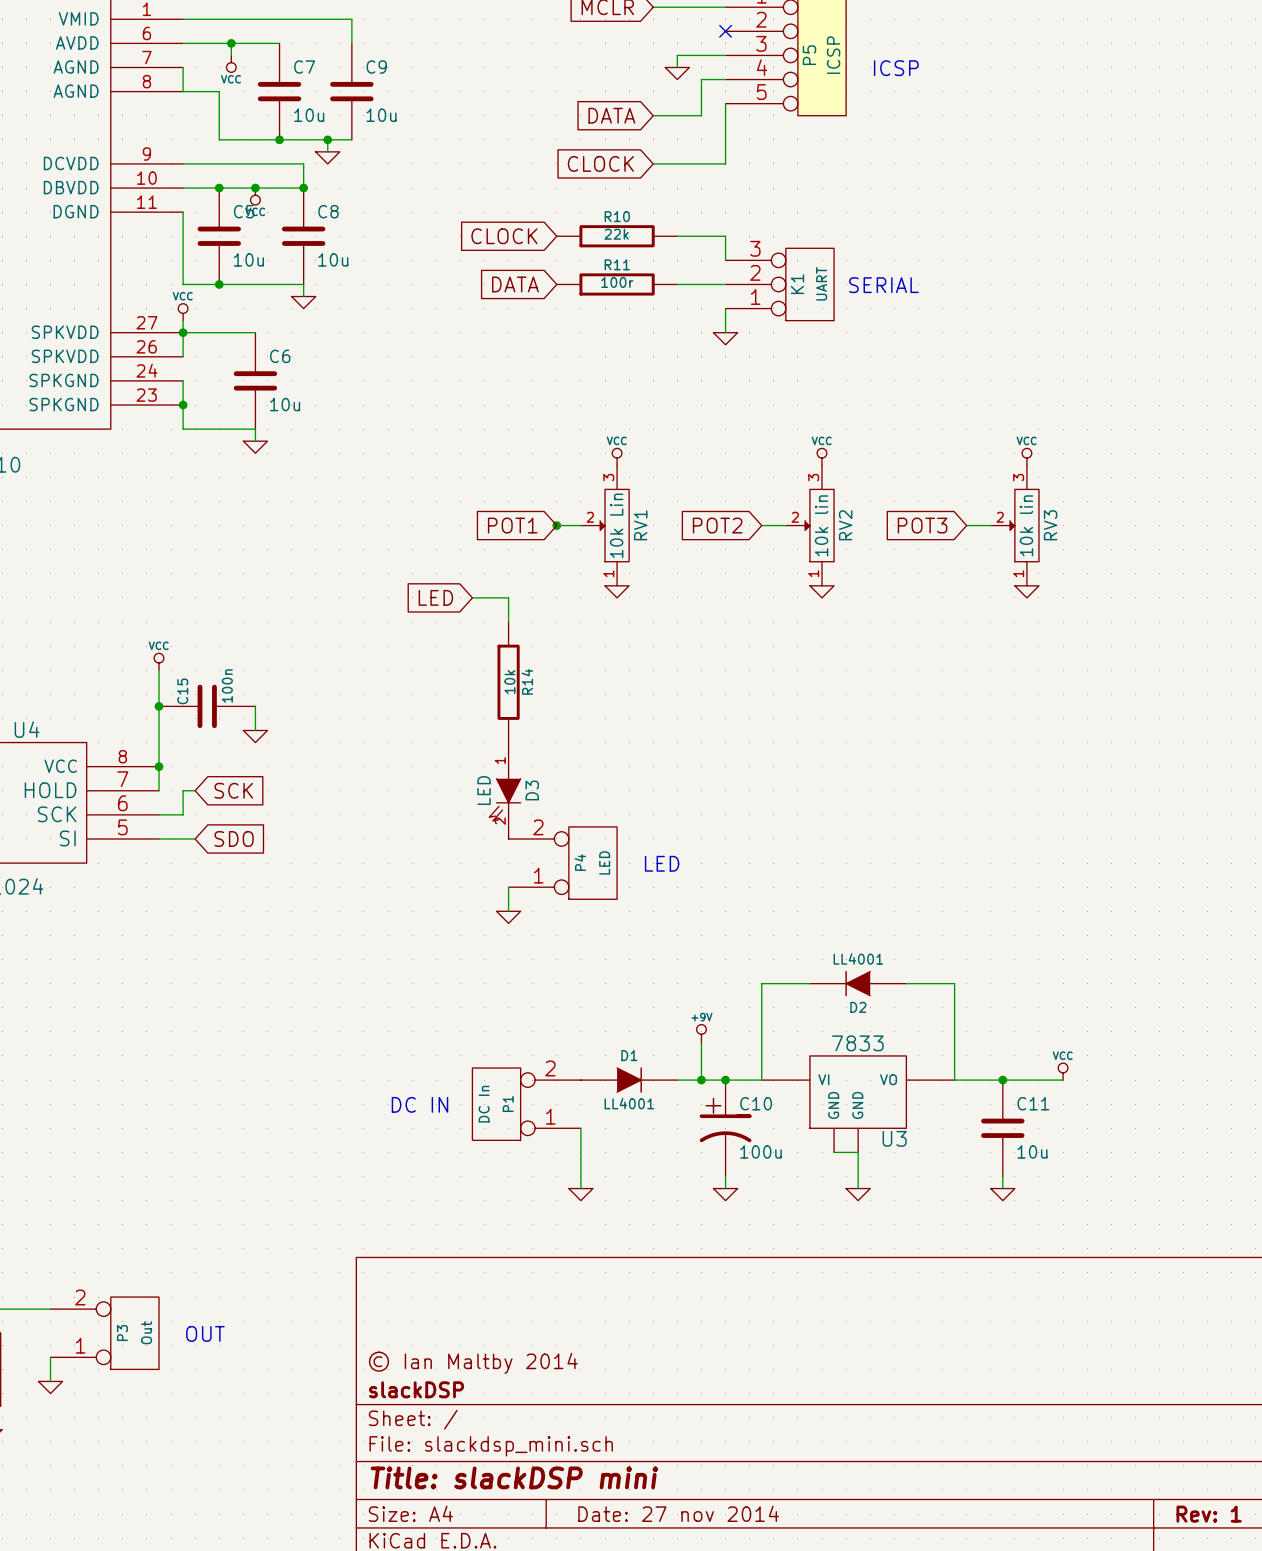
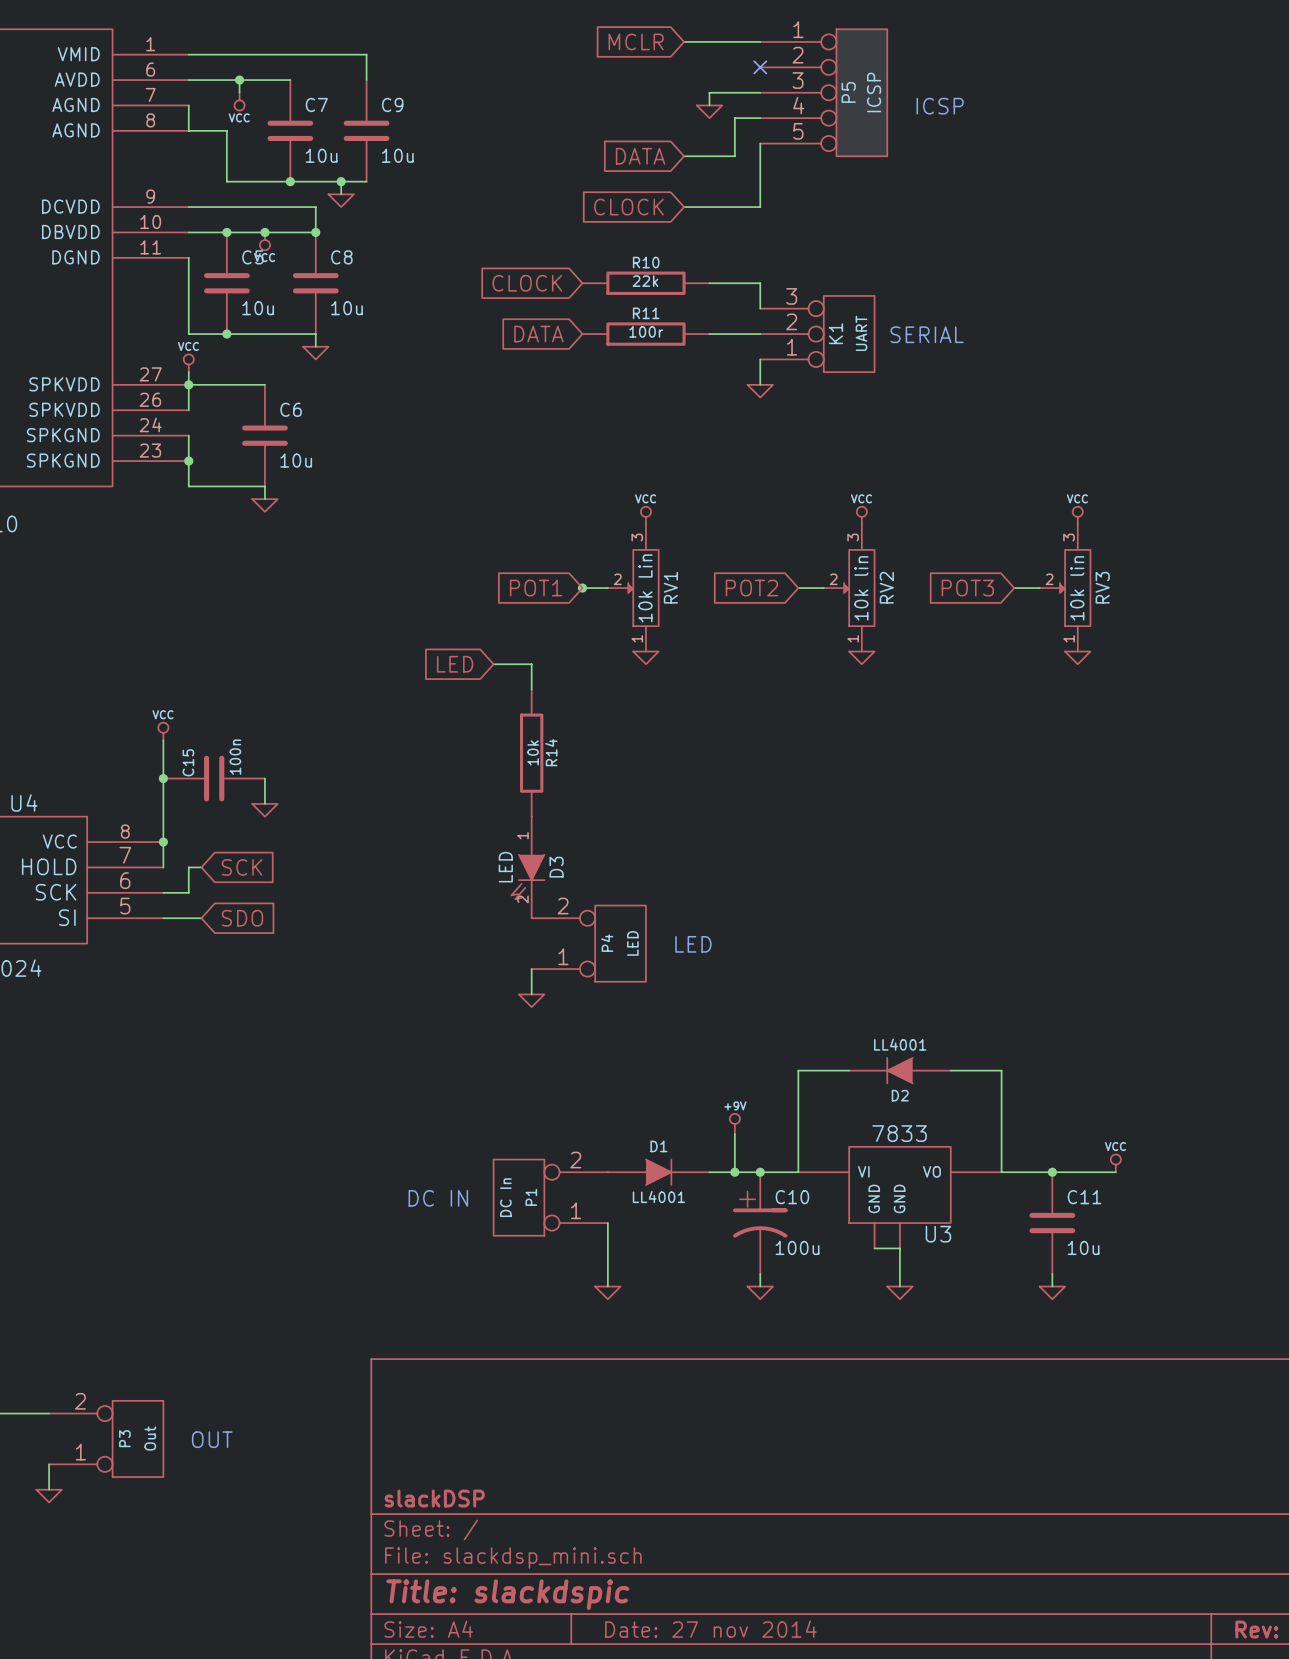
title block: © Ian Maltby 2014 (473, 1362) -> none
title block: Title: slackDSP mini (514, 1477) -> Title: slackdspic (507, 1594)

